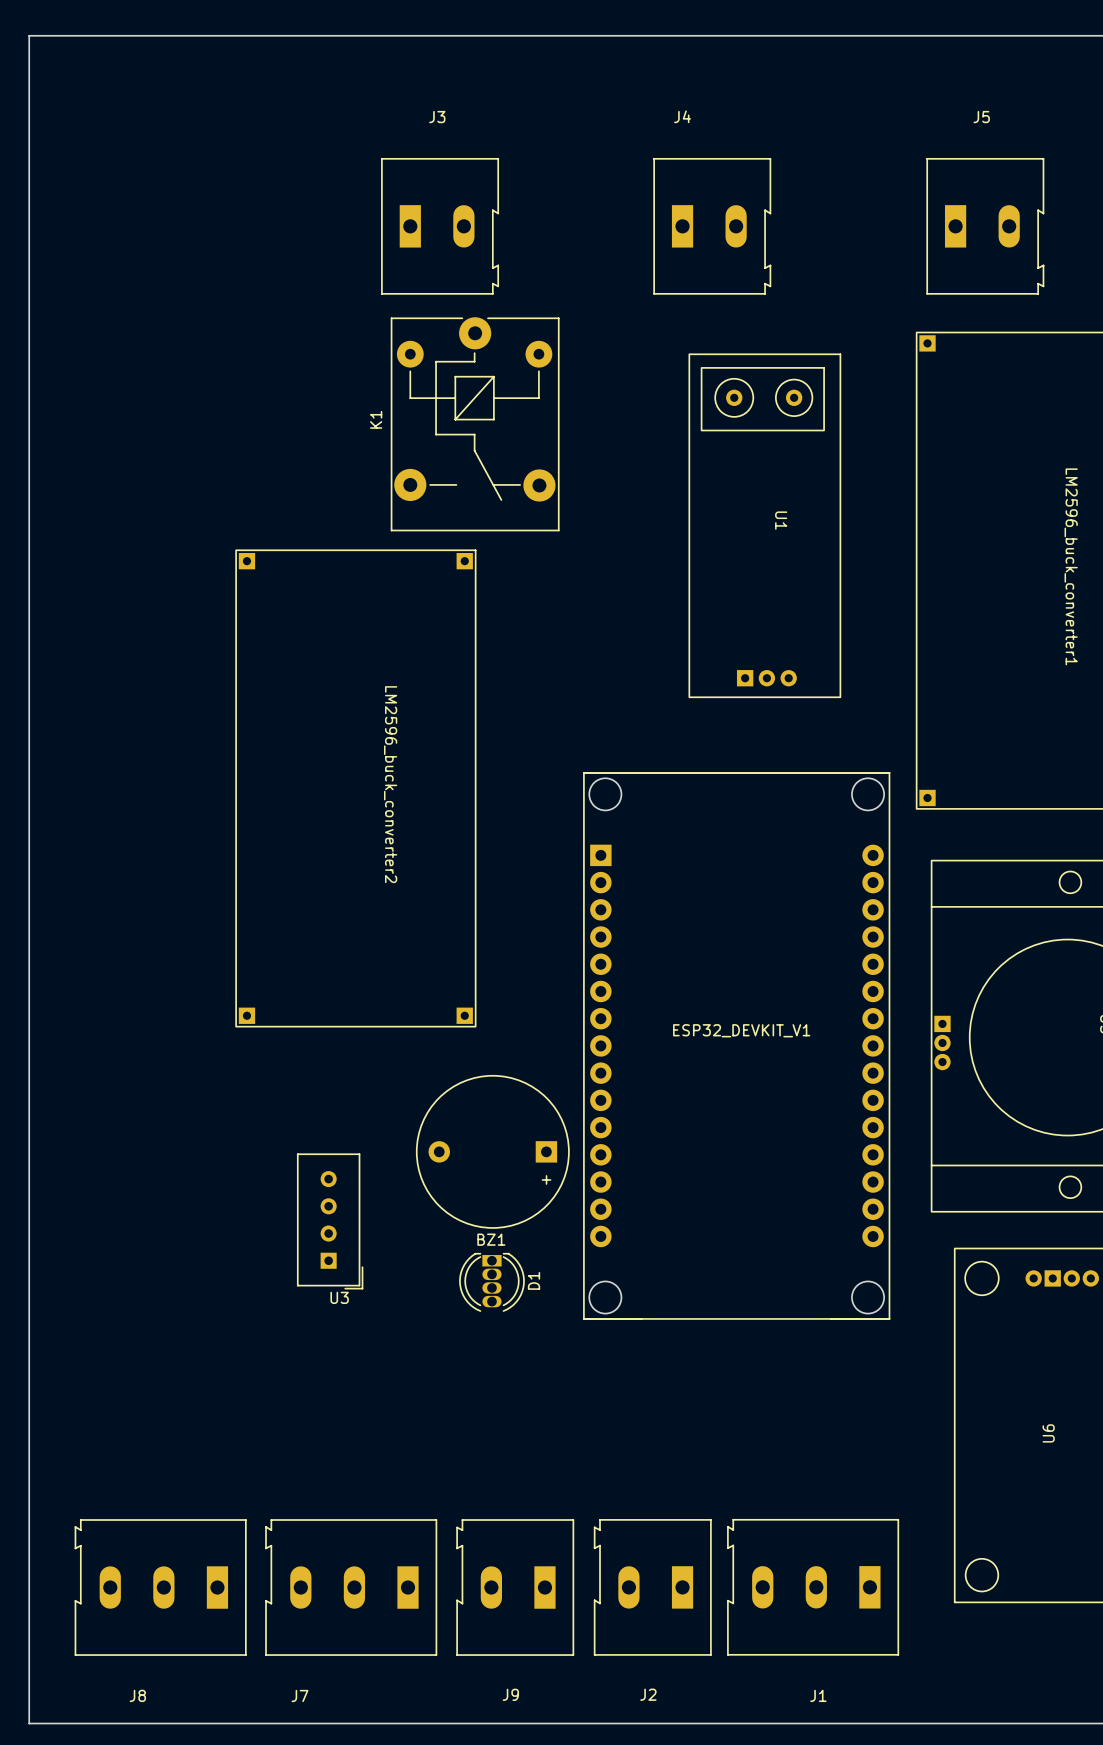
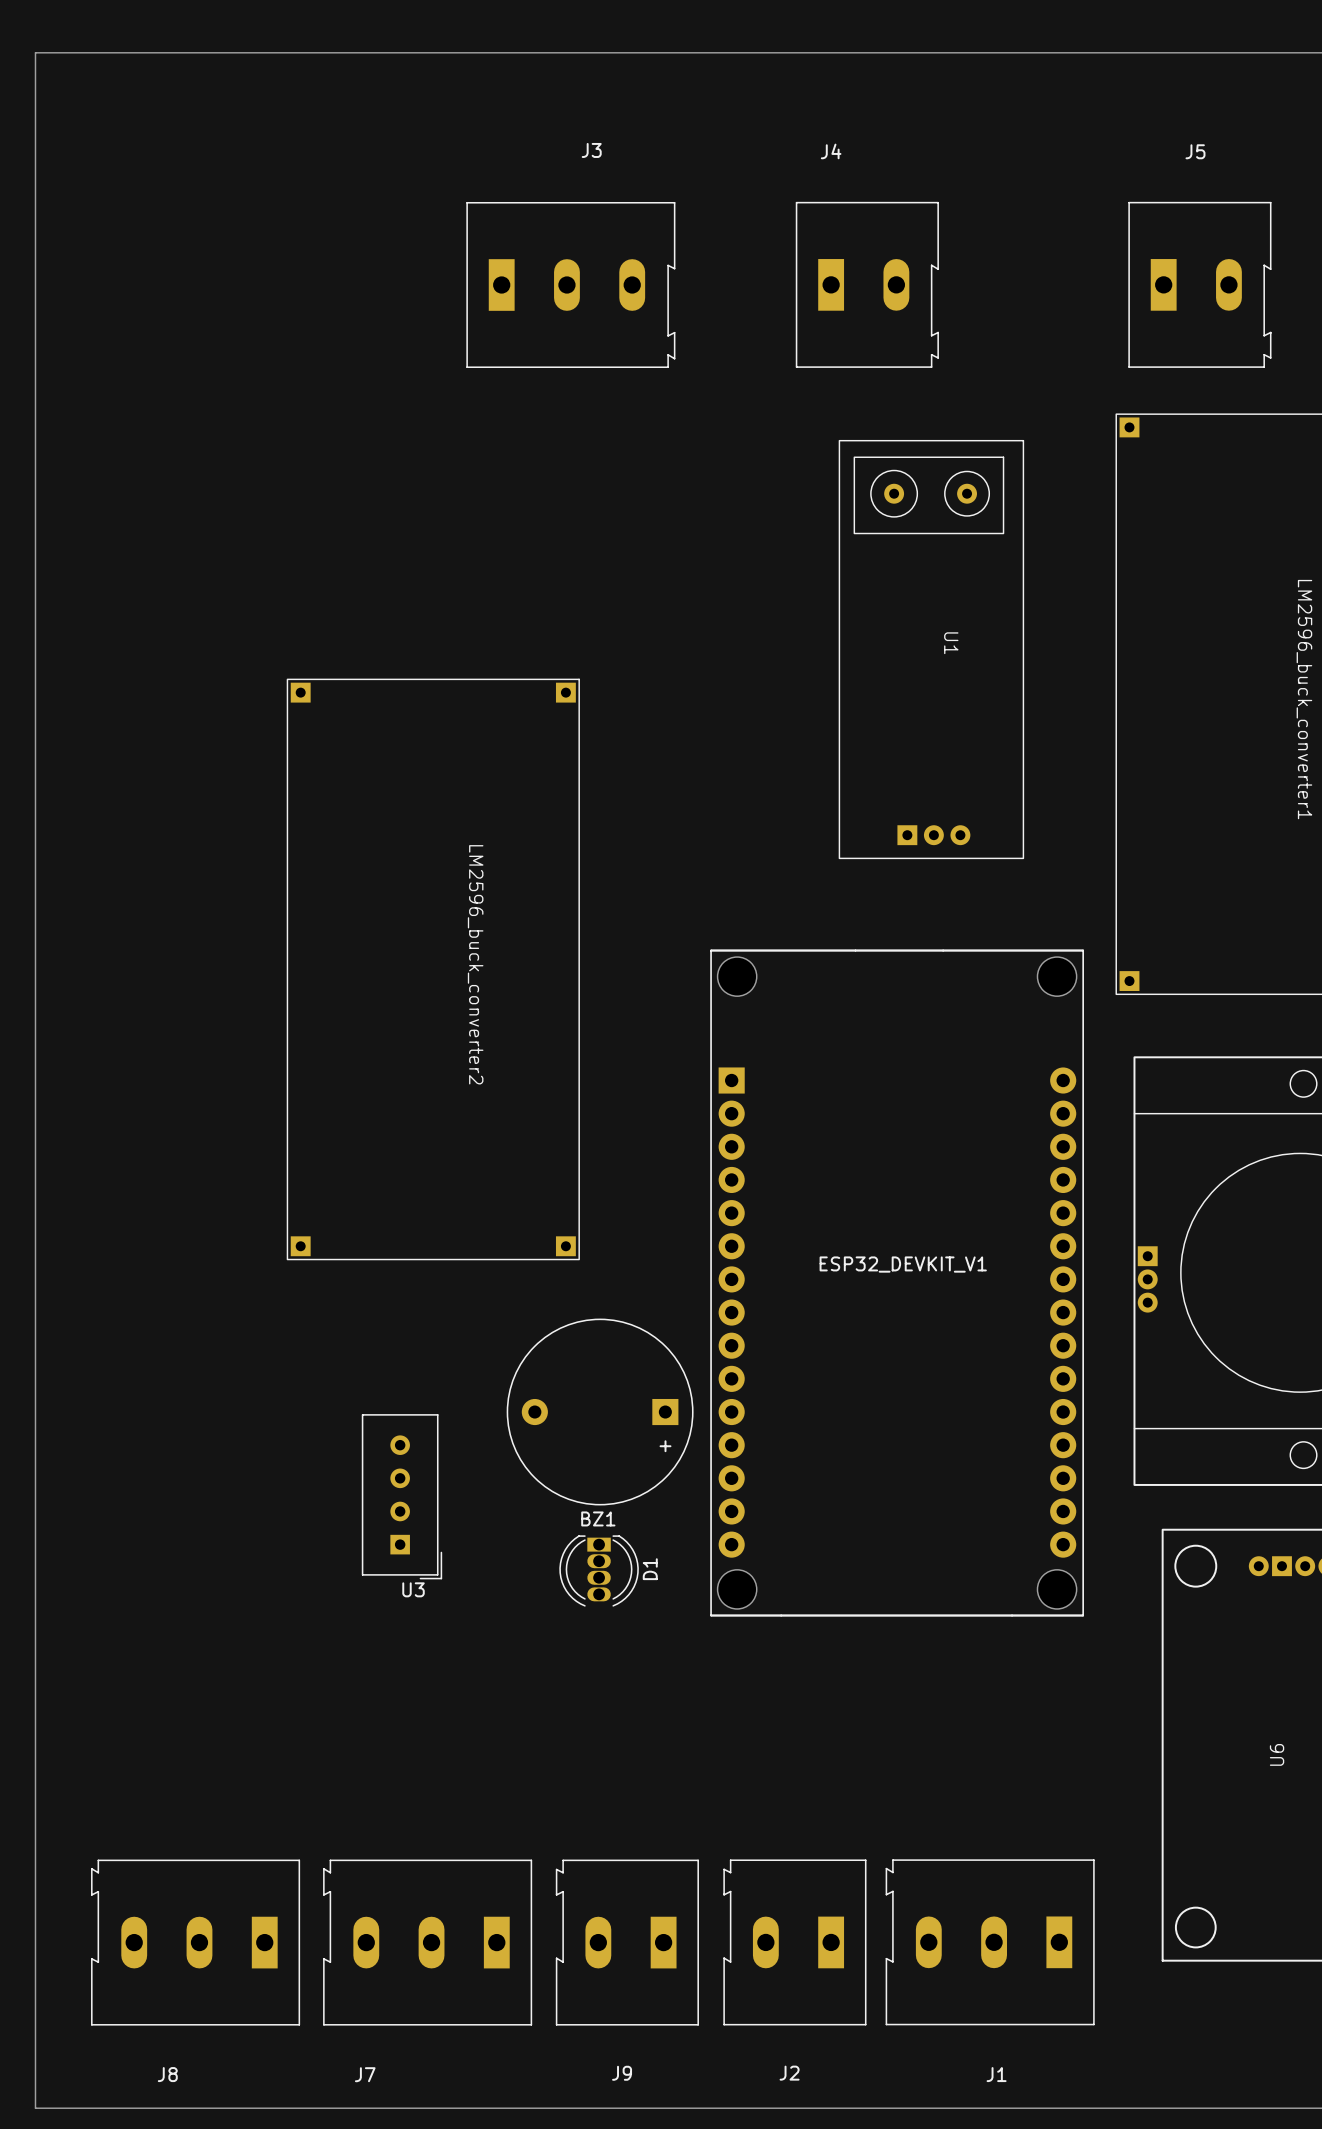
J3 footprint: [381, 158, 499, 295] -> [466, 201, 676, 369]
K1: (475, 424) -> none
ESP32_DEVKIT_V1 footprint: [583, 772, 891, 1320] -> [710, 949, 1084, 1617]

